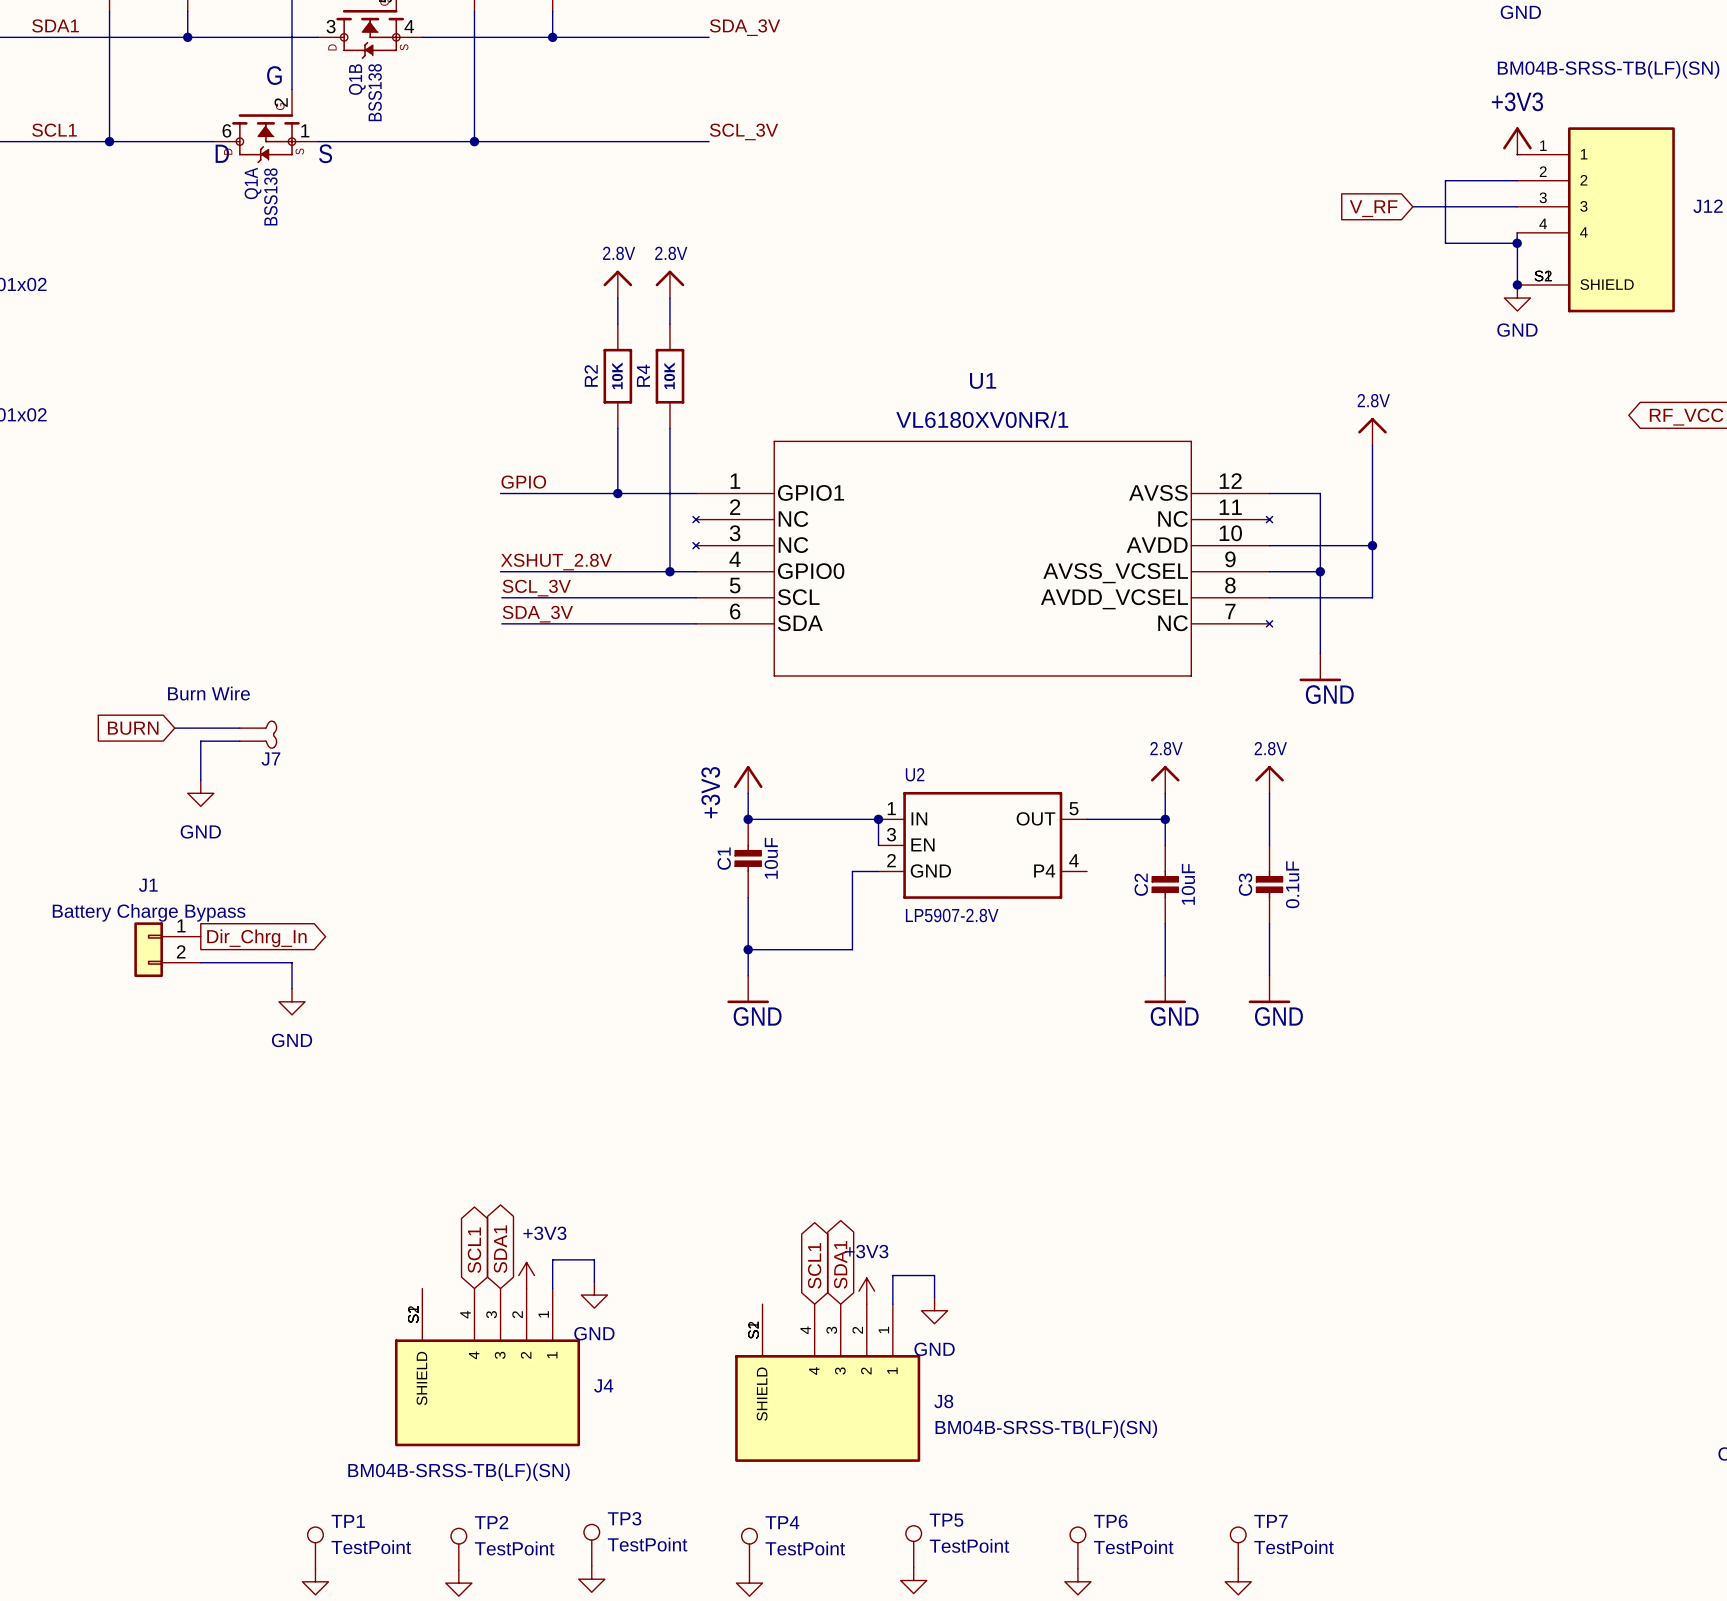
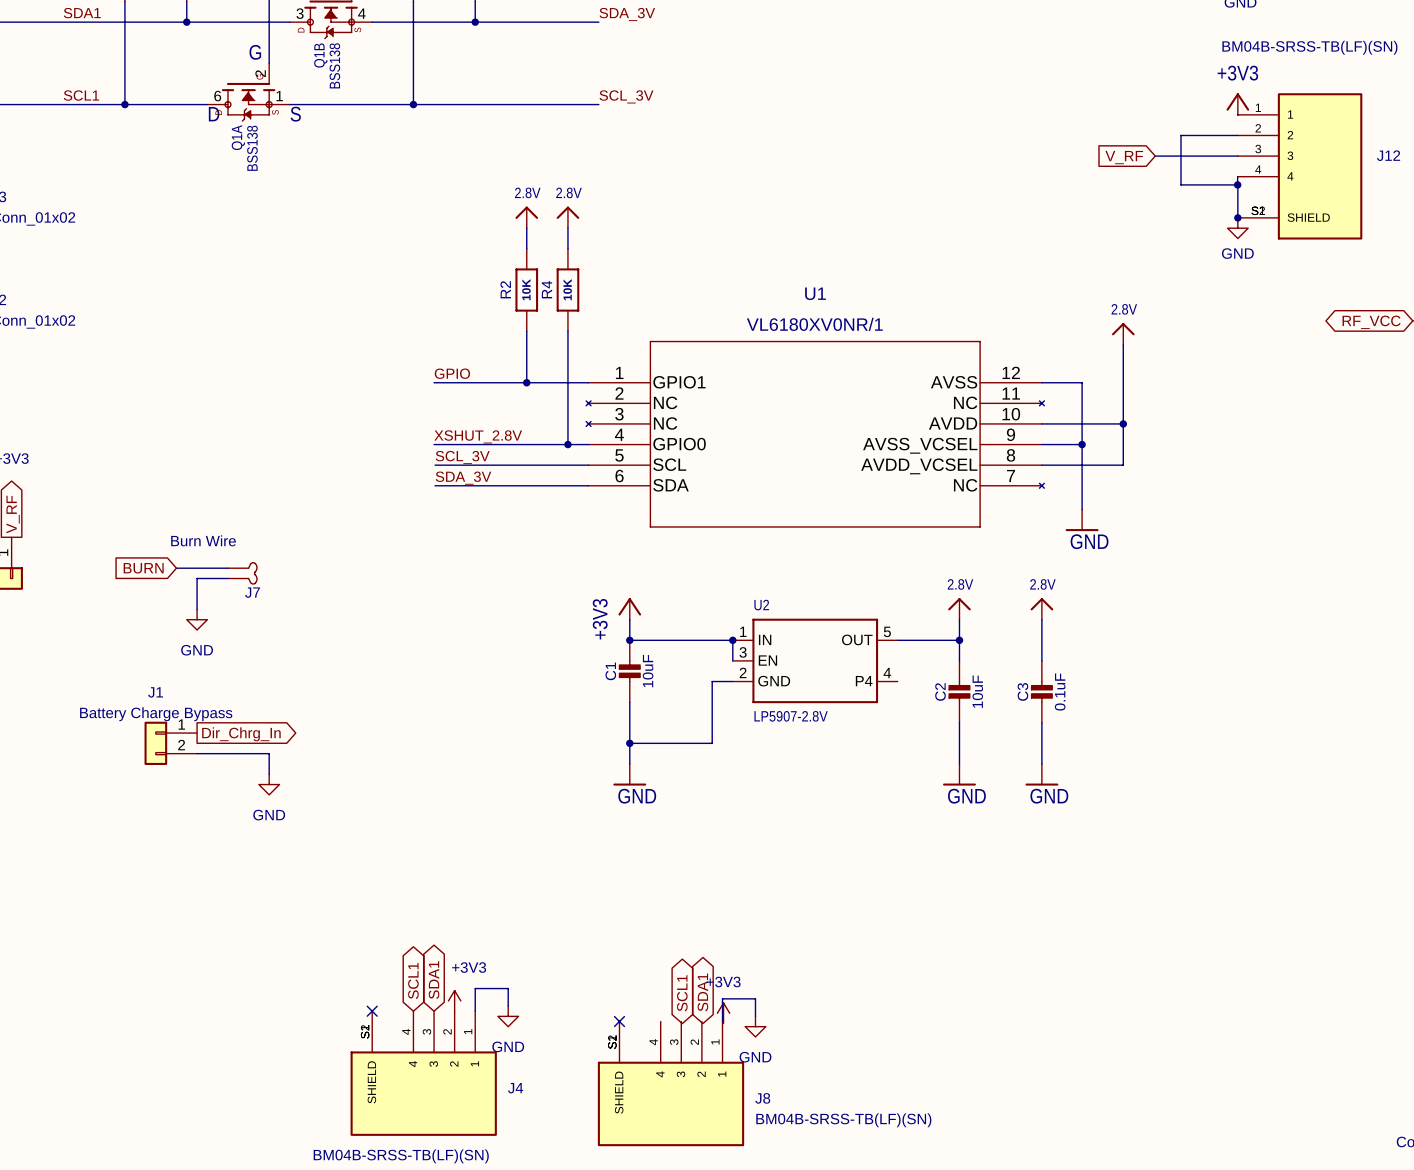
no-connect mark: none -> (372, 1011)
wire: (934, 1297) (934, 1275) (892, 1275) (892, 1304) -> (755, 1016) (755, 998) (722, 998) (722, 1021)
no-connect mark: none -> (619, 1021)
power symbol position: GND (934, 1310) -> GND (755, 1026)
J8 position: (827, 1383) -> (671, 1083)

